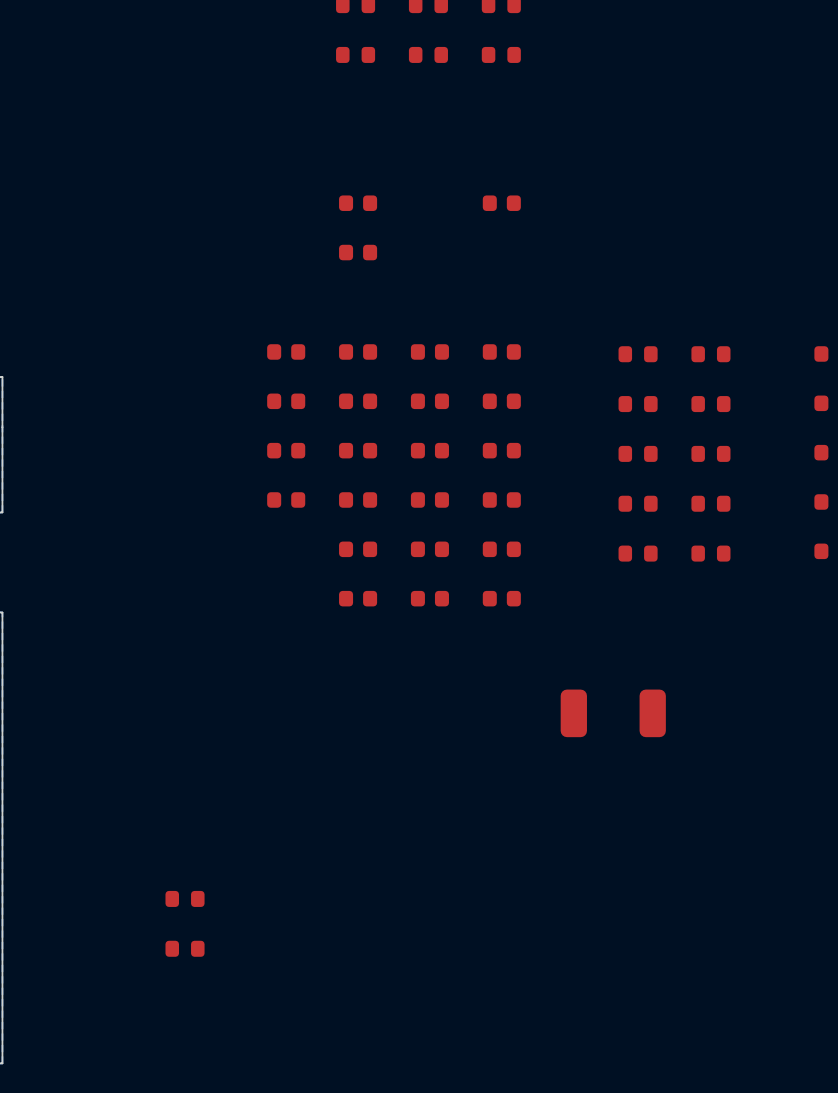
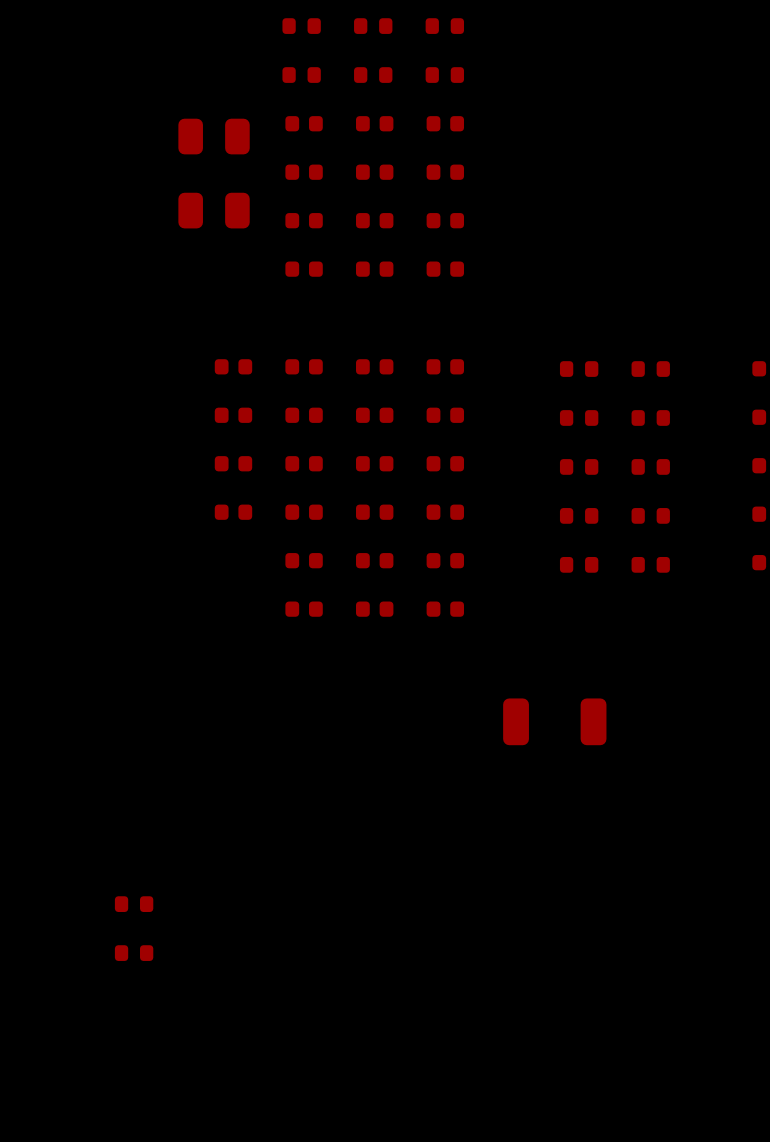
part: none -> (304, 123)
part: none -> (374, 123)
part: none -> (445, 123)
part: none -> (214, 136)
part: none -> (304, 172)
part: none -> (374, 172)
part: none -> (445, 172)
part: none -> (214, 210)
part: none -> (374, 220)
part: none -> (374, 269)
part: none -> (445, 269)

